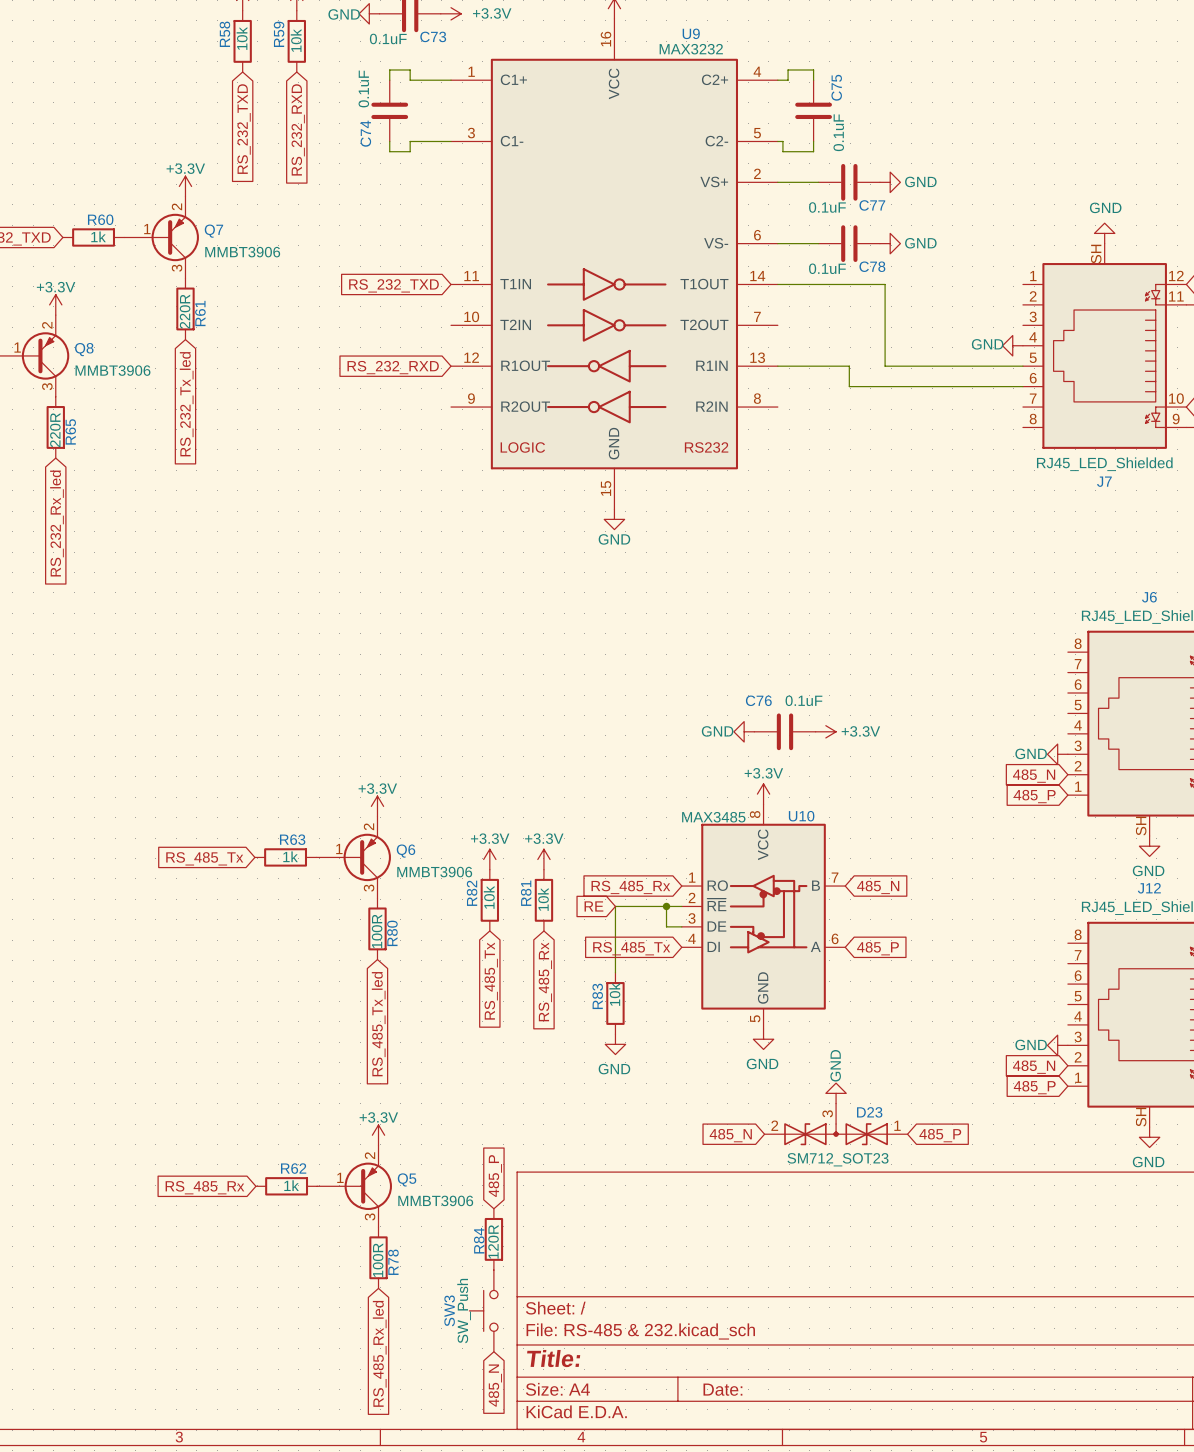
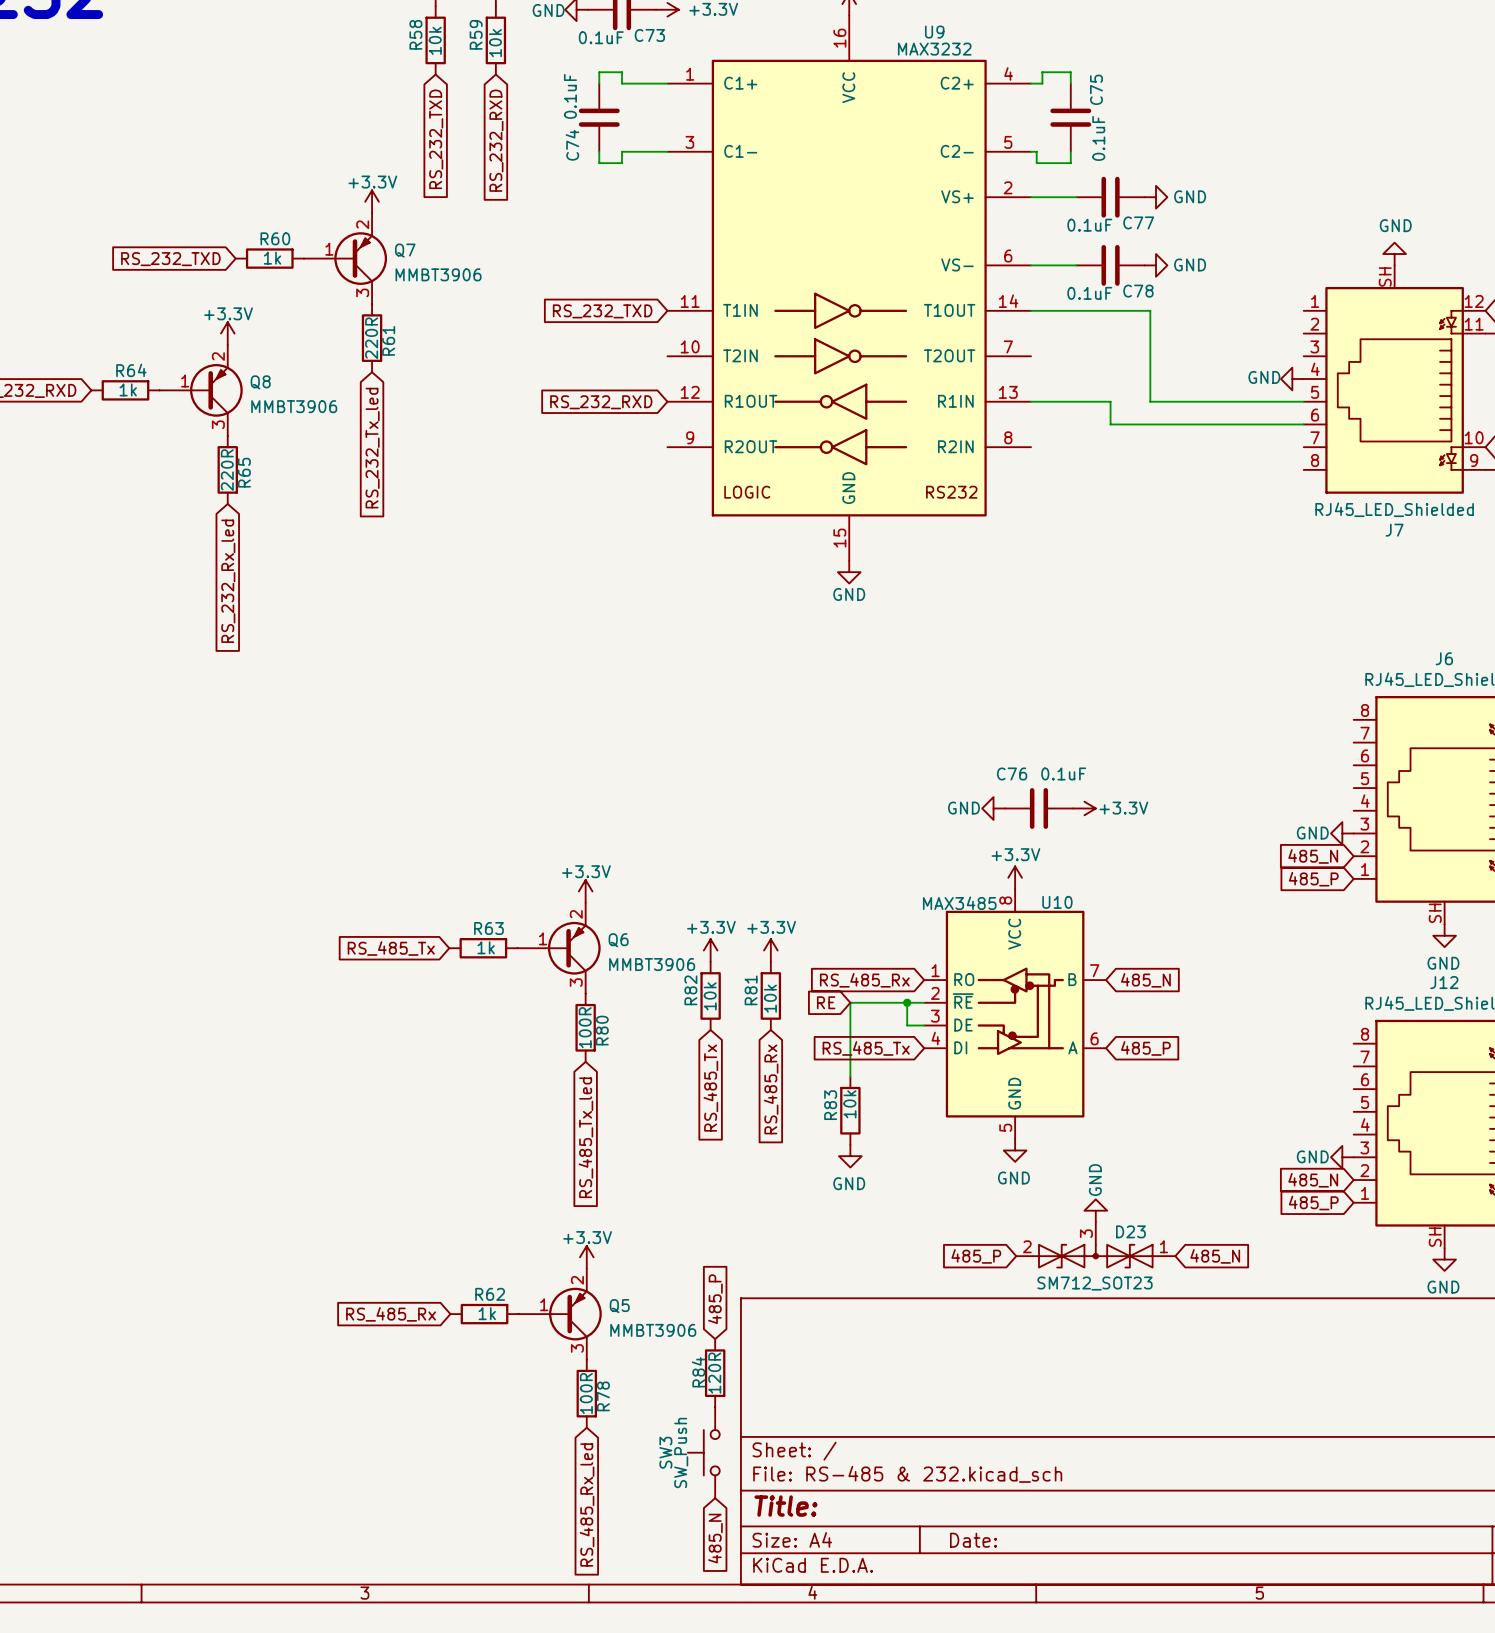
global label: 485_N (730, 1135) -> 485_P (976, 1256)
global label: 485_P (940, 1135) -> 485_N (1215, 1256)

